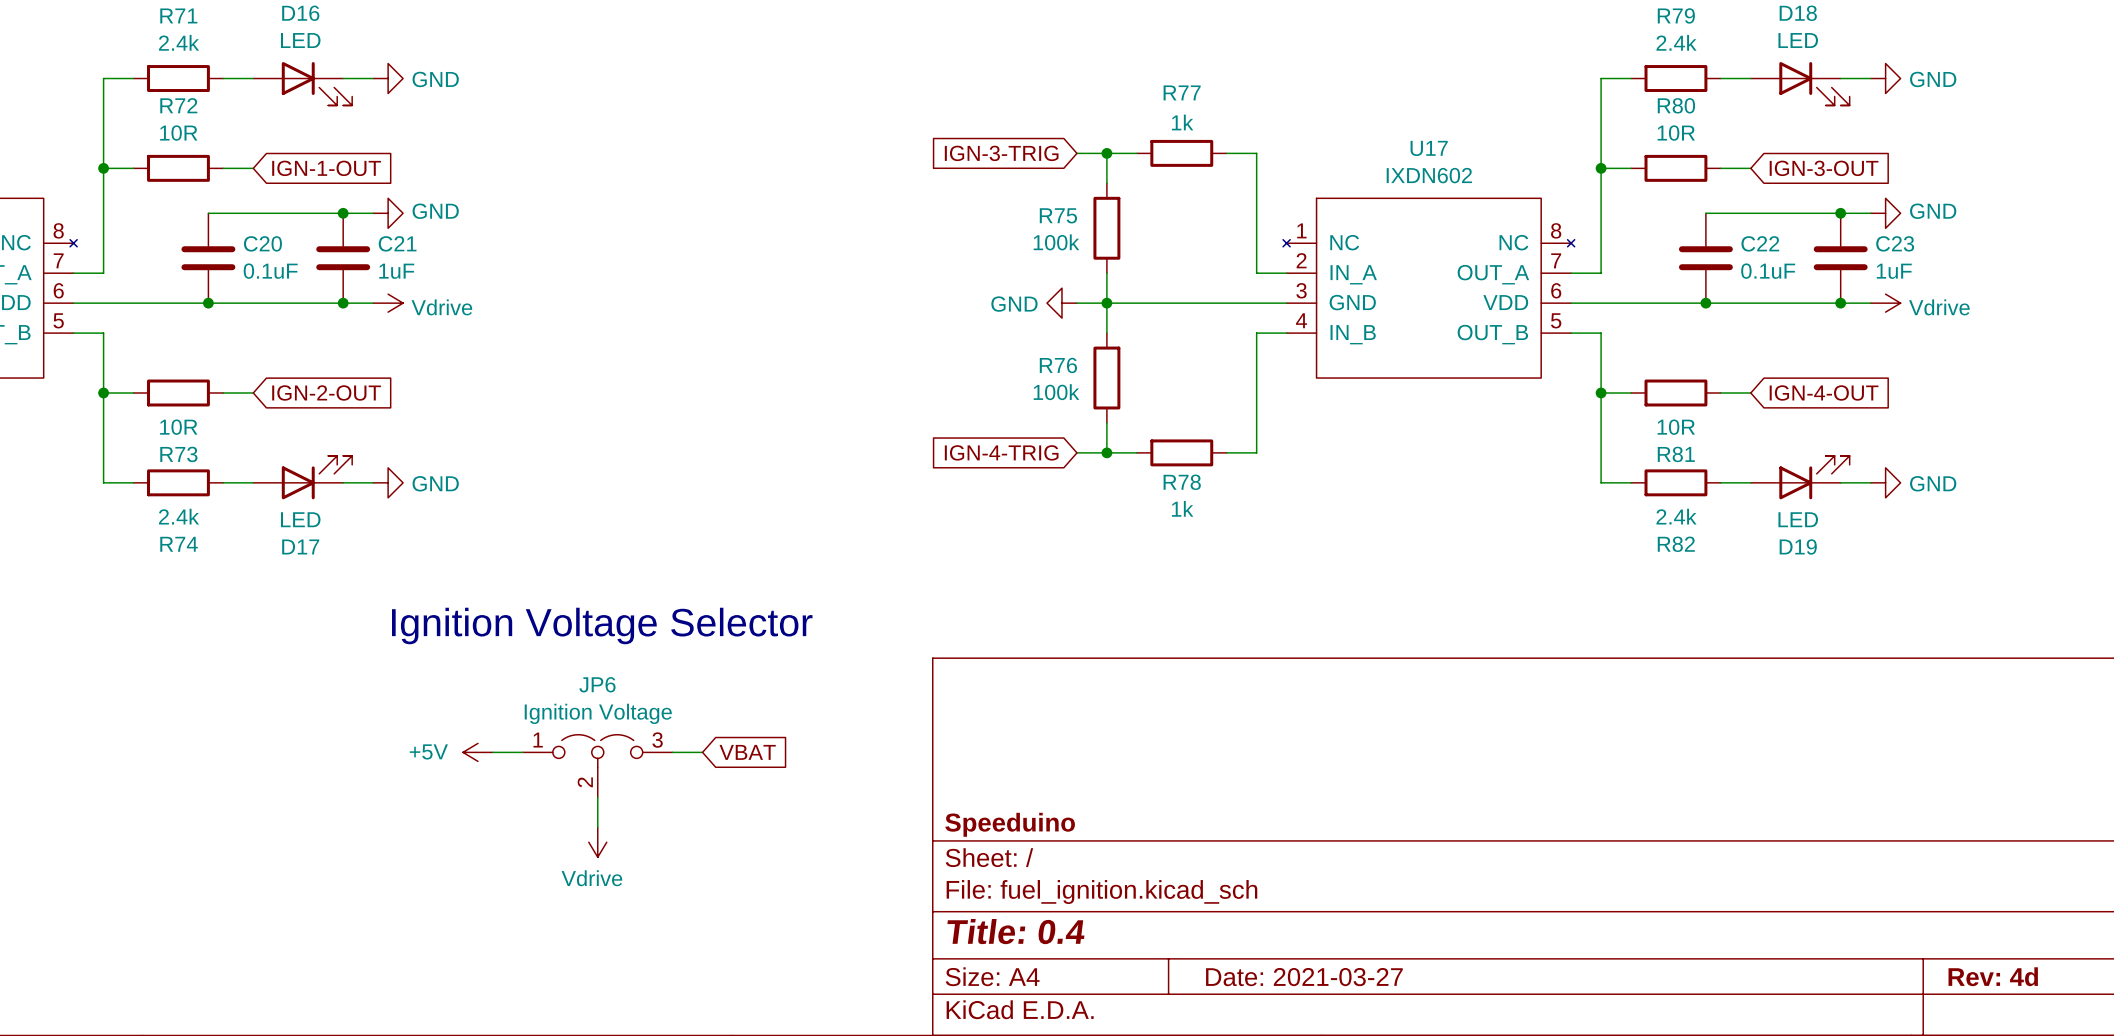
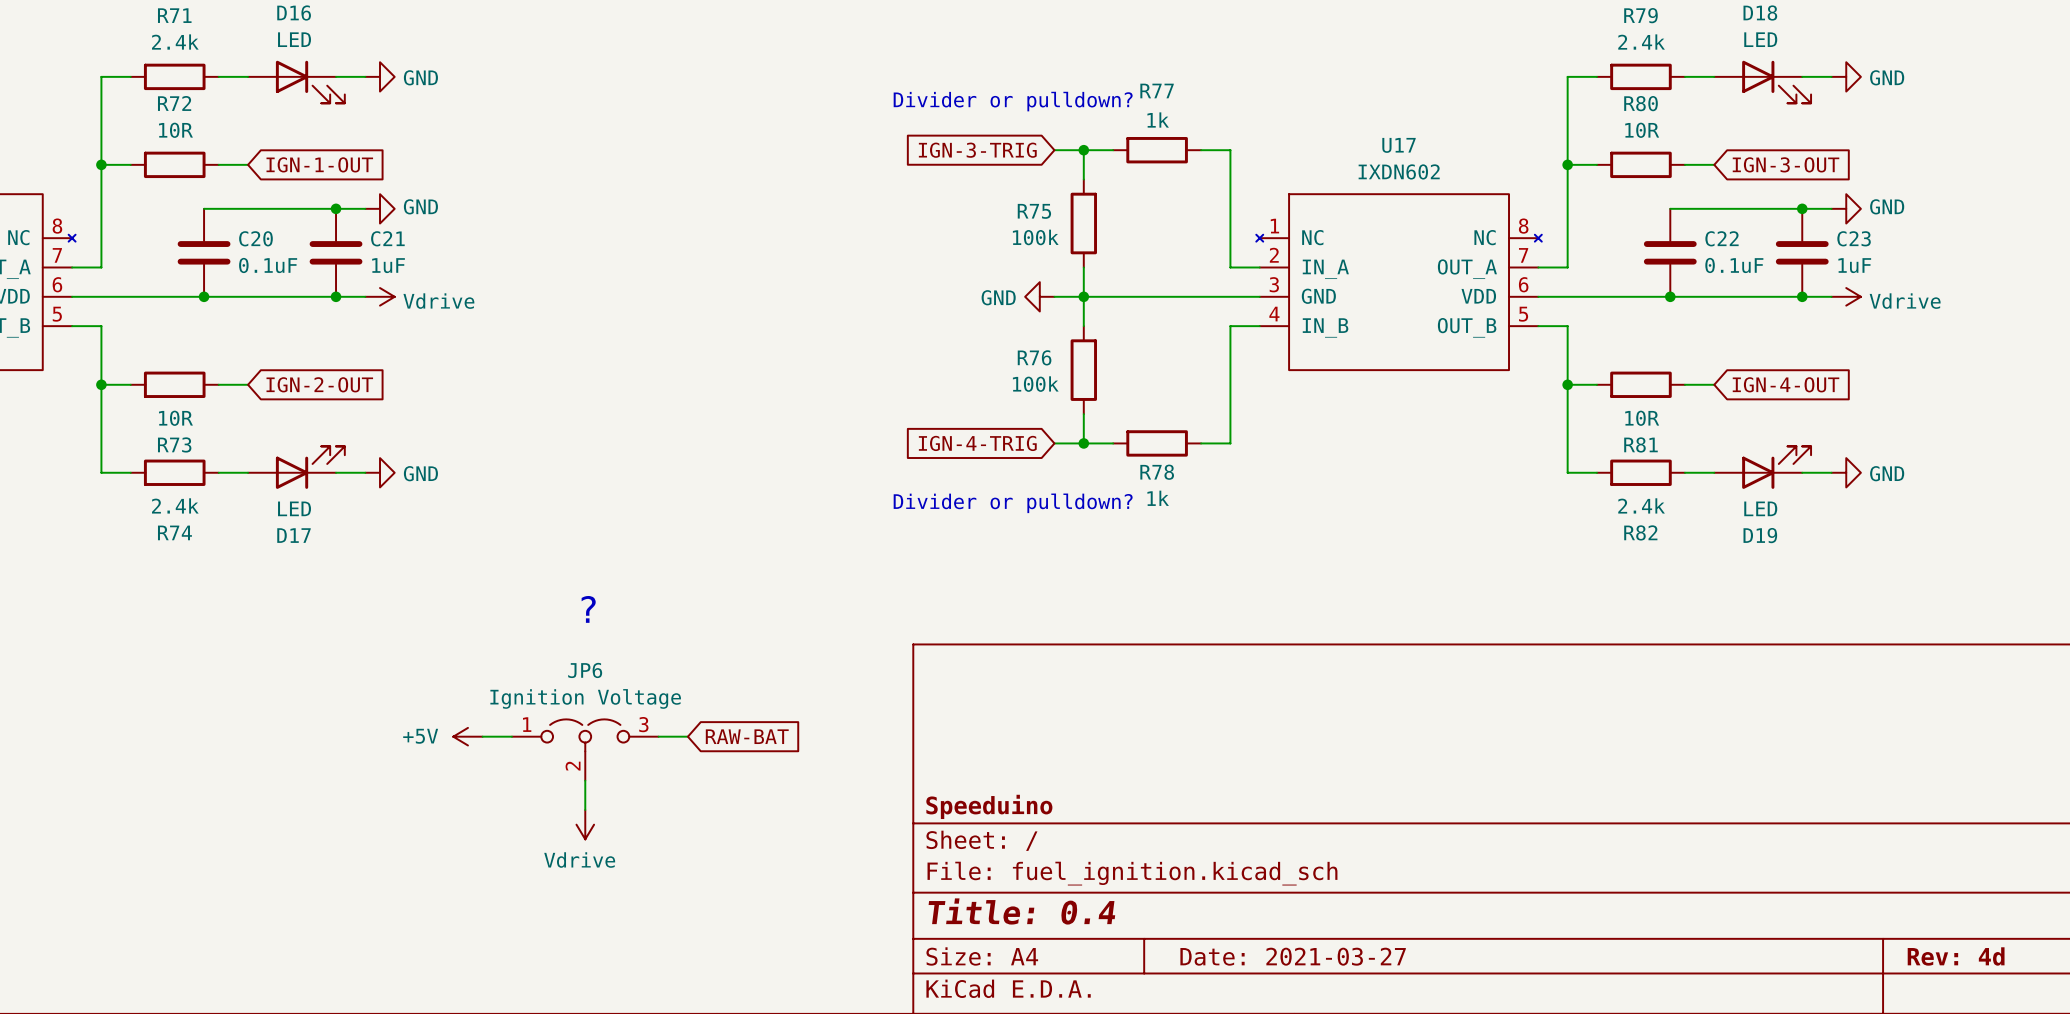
text: none -> Divider or pulldown? (1013, 101)
text: none -> Divider or pulldown? (1013, 503)
text: Ignition Voltage Selector (602, 625) -> ? (588, 609)
global label: VBAT (747, 752) -> RAW-BAT (747, 736)

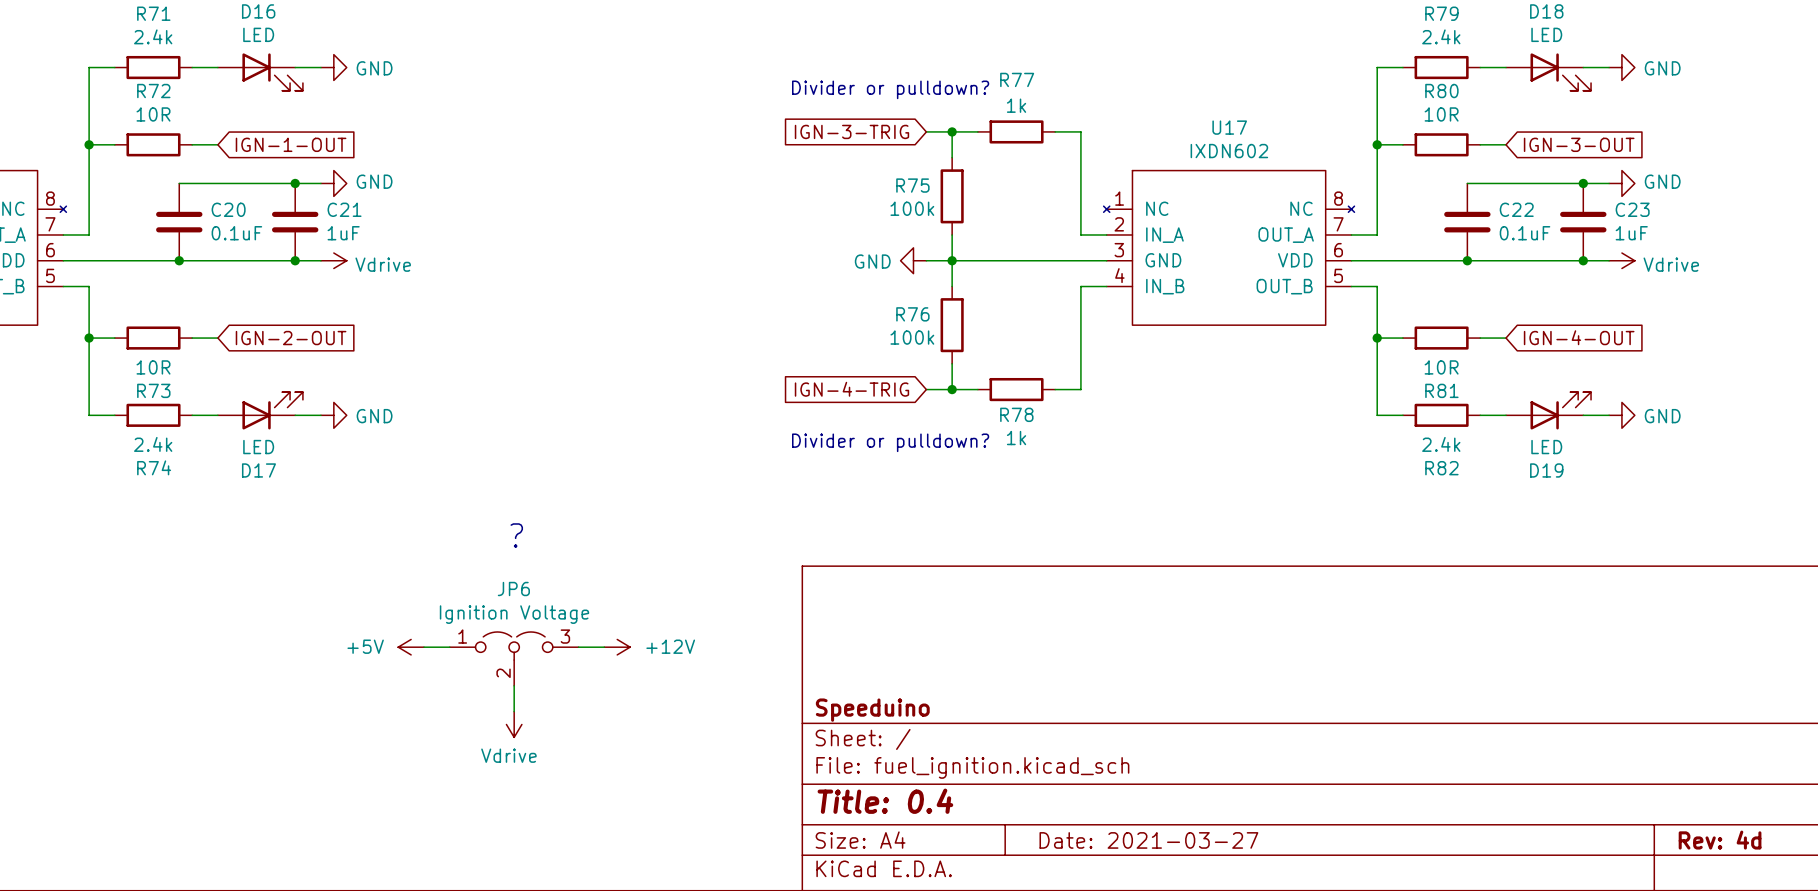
power symbol: none -> +12V (617, 647)
global label: RAW-BAT (747, 736) -> none

